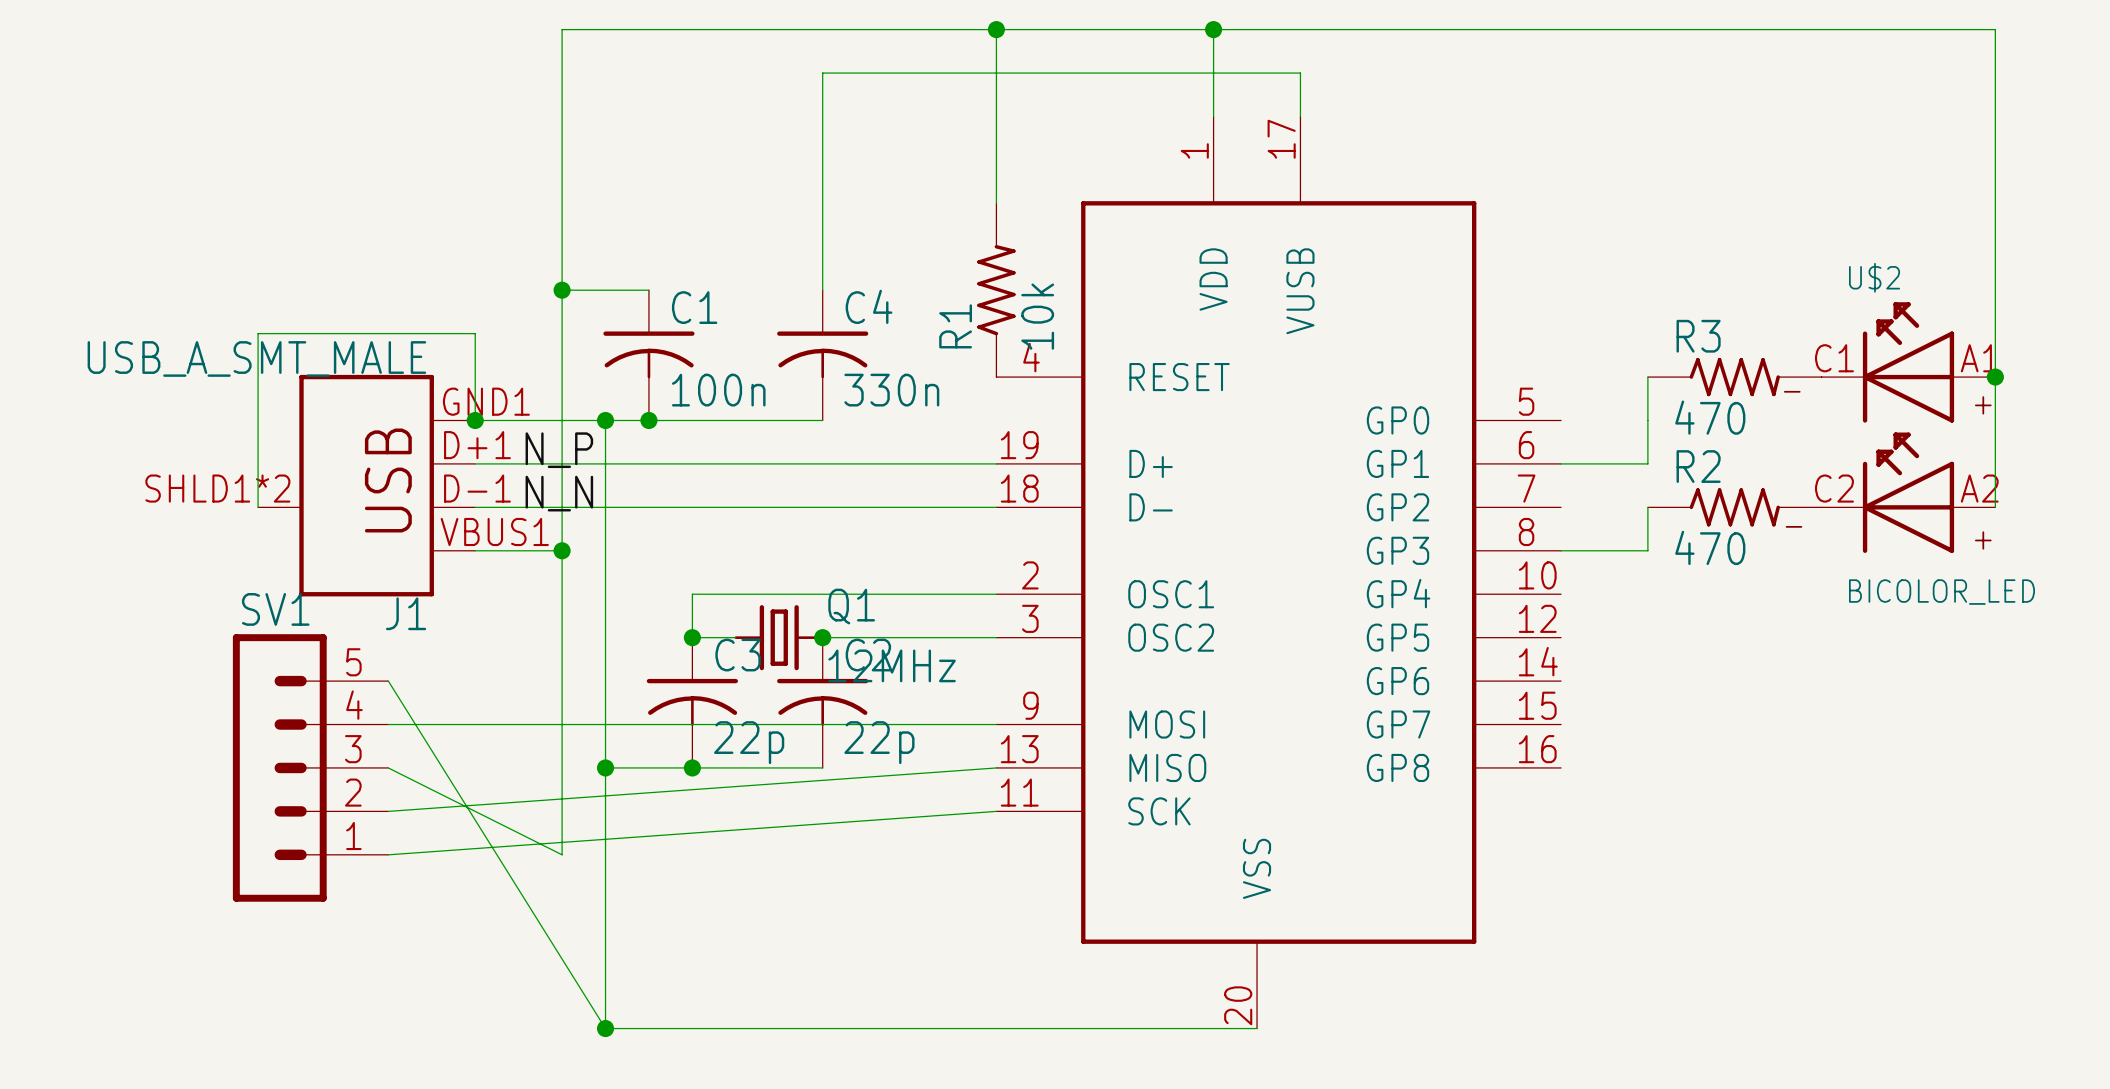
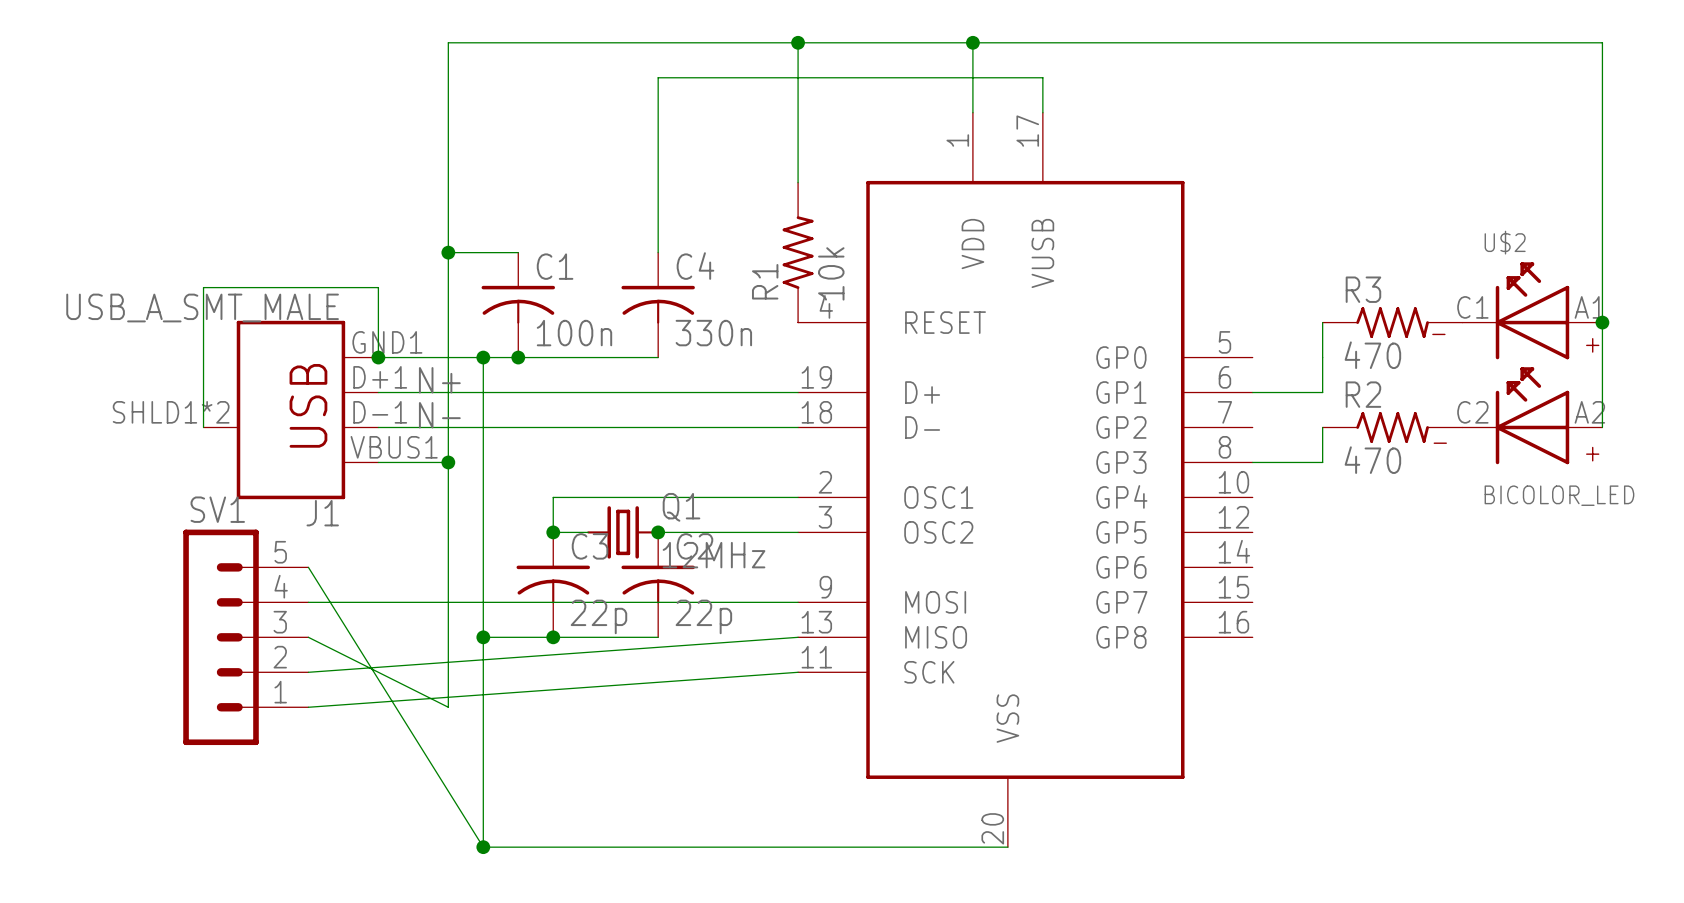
label: N_P (559, 450) -> N+ (439, 380)
label: N_N (559, 493) -> N- (439, 415)

